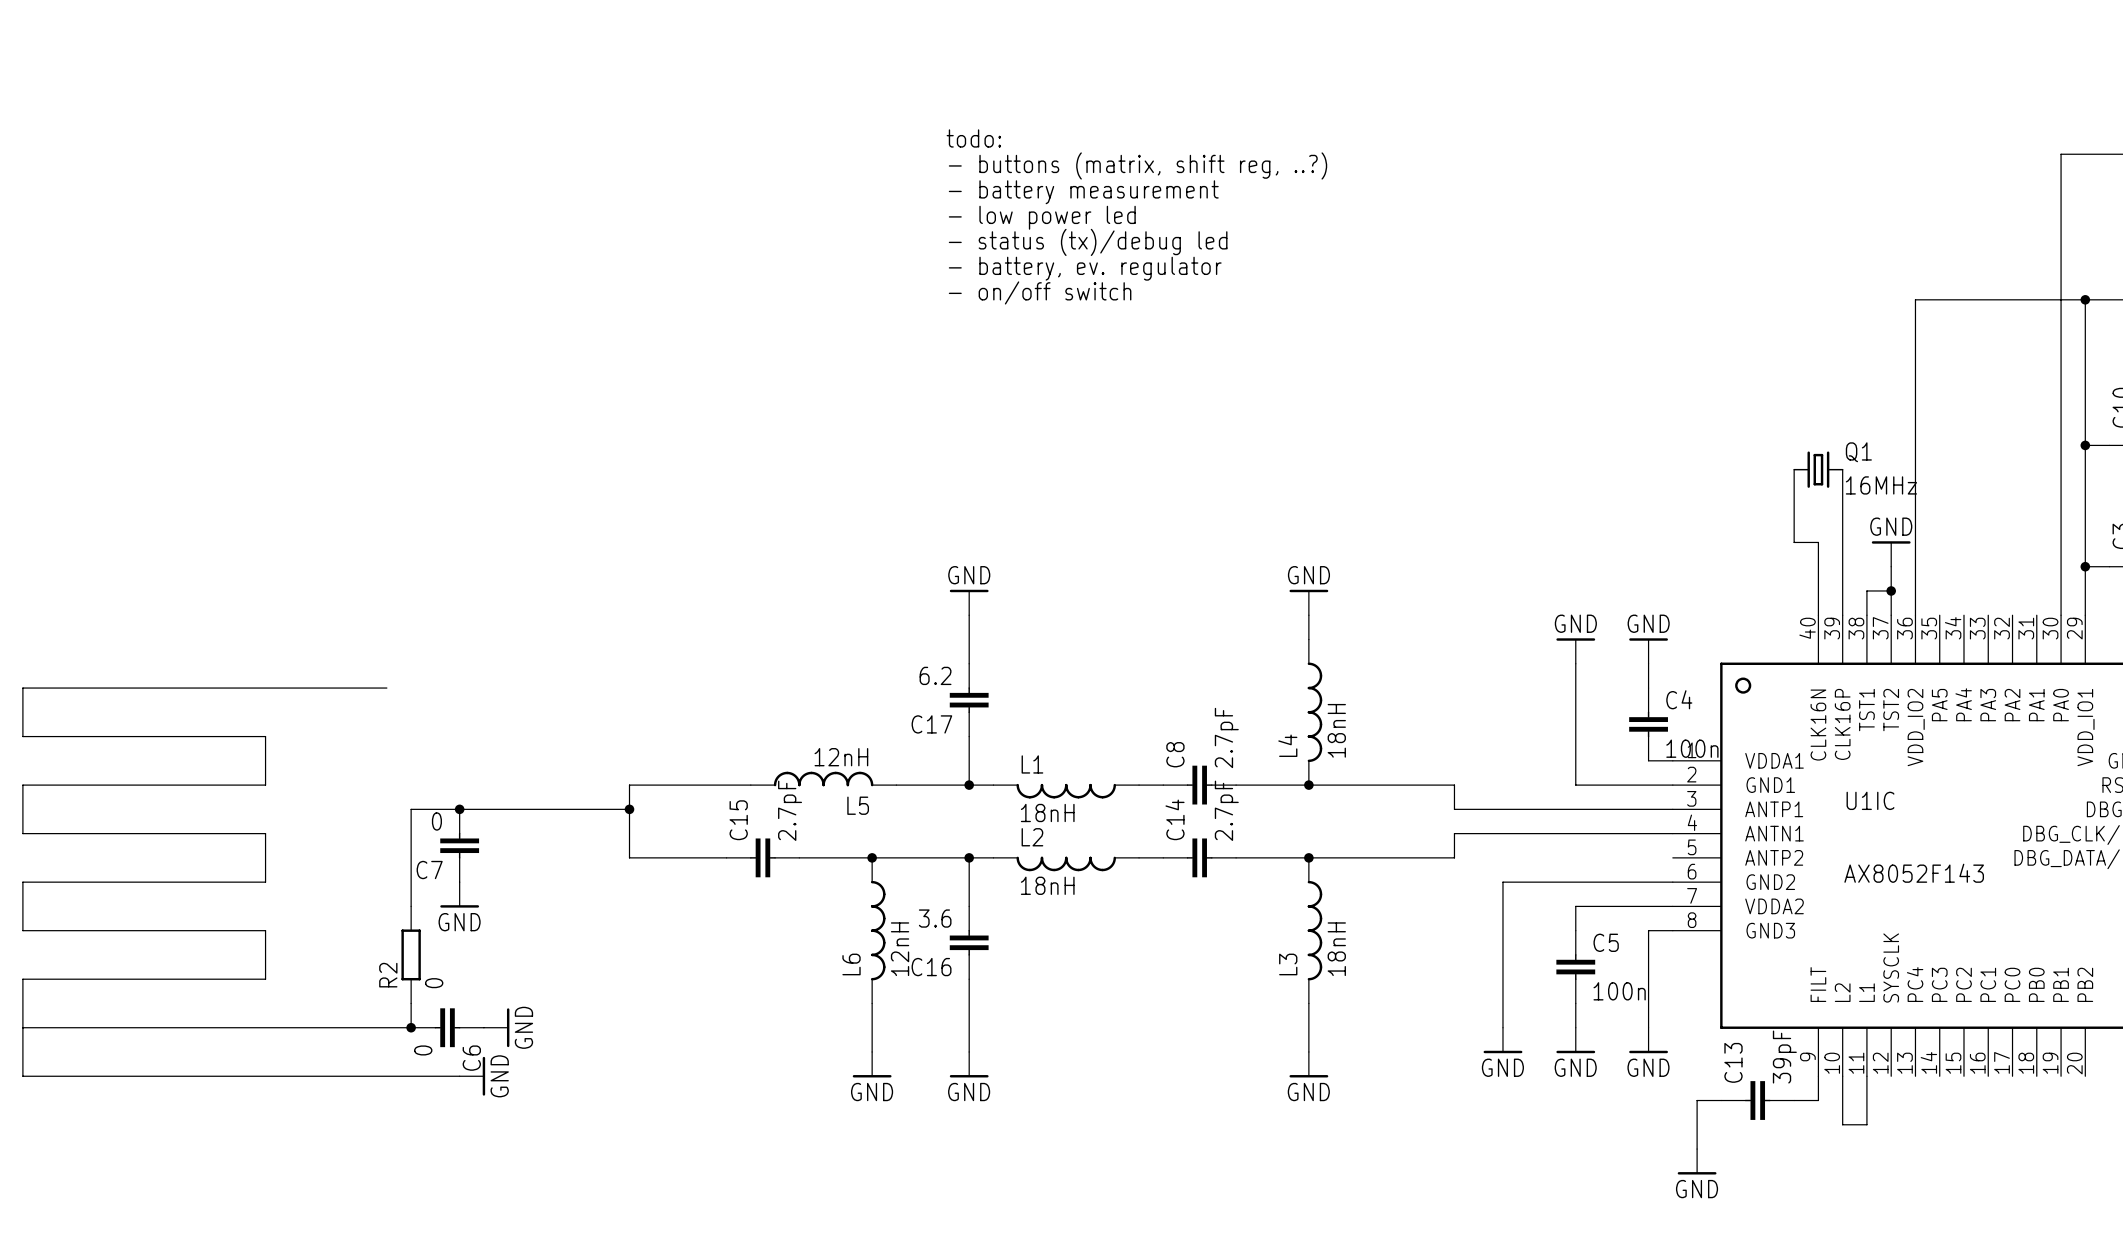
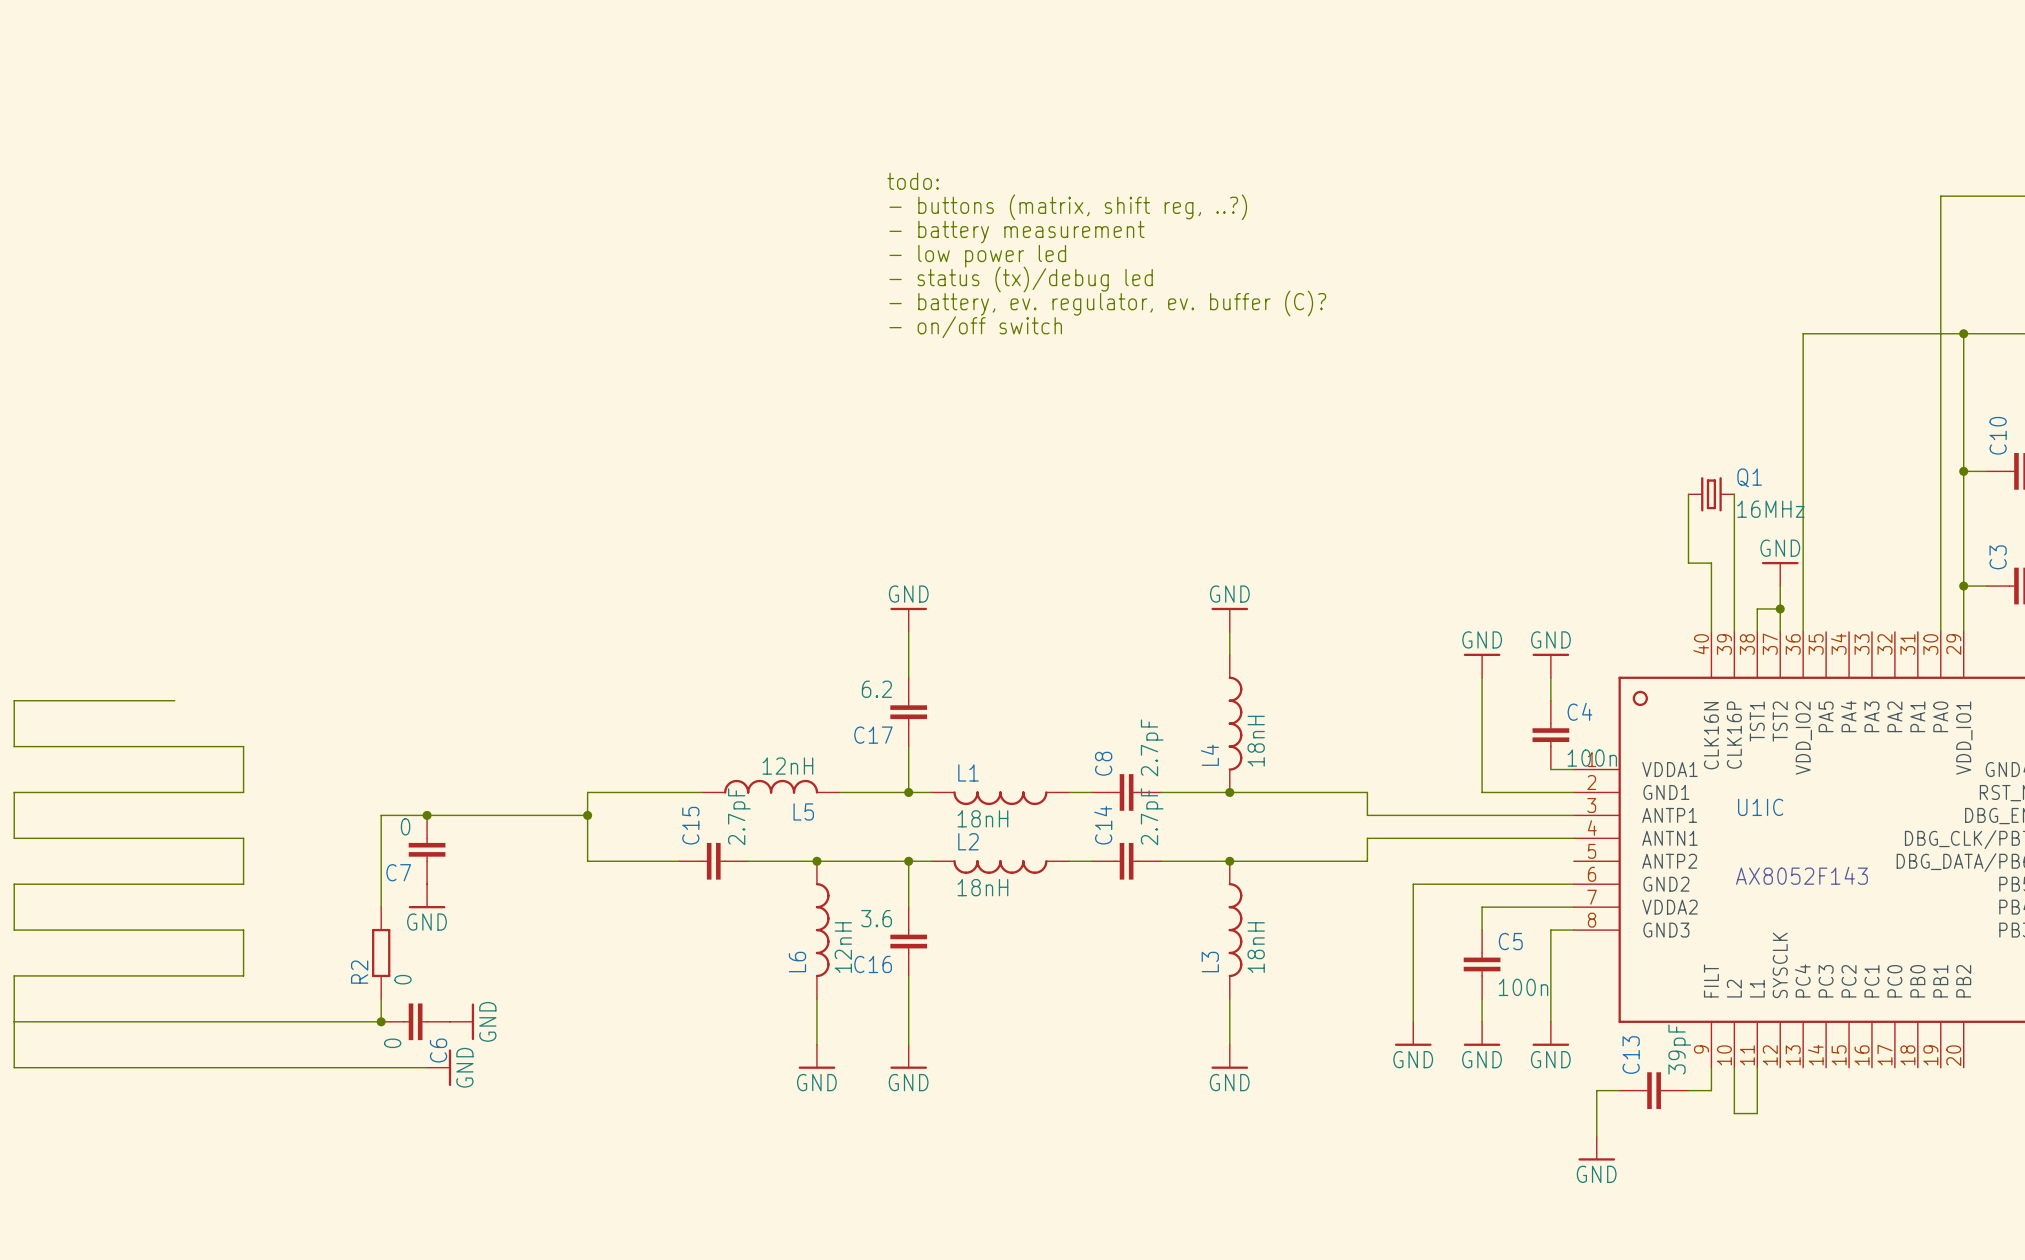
text: - battery, ev. regulator (1085, 268) -> - battery, ev. regulator, ev. buffer (C)? (1107, 303)
wire: (192, 688) (386, 688) -> none

